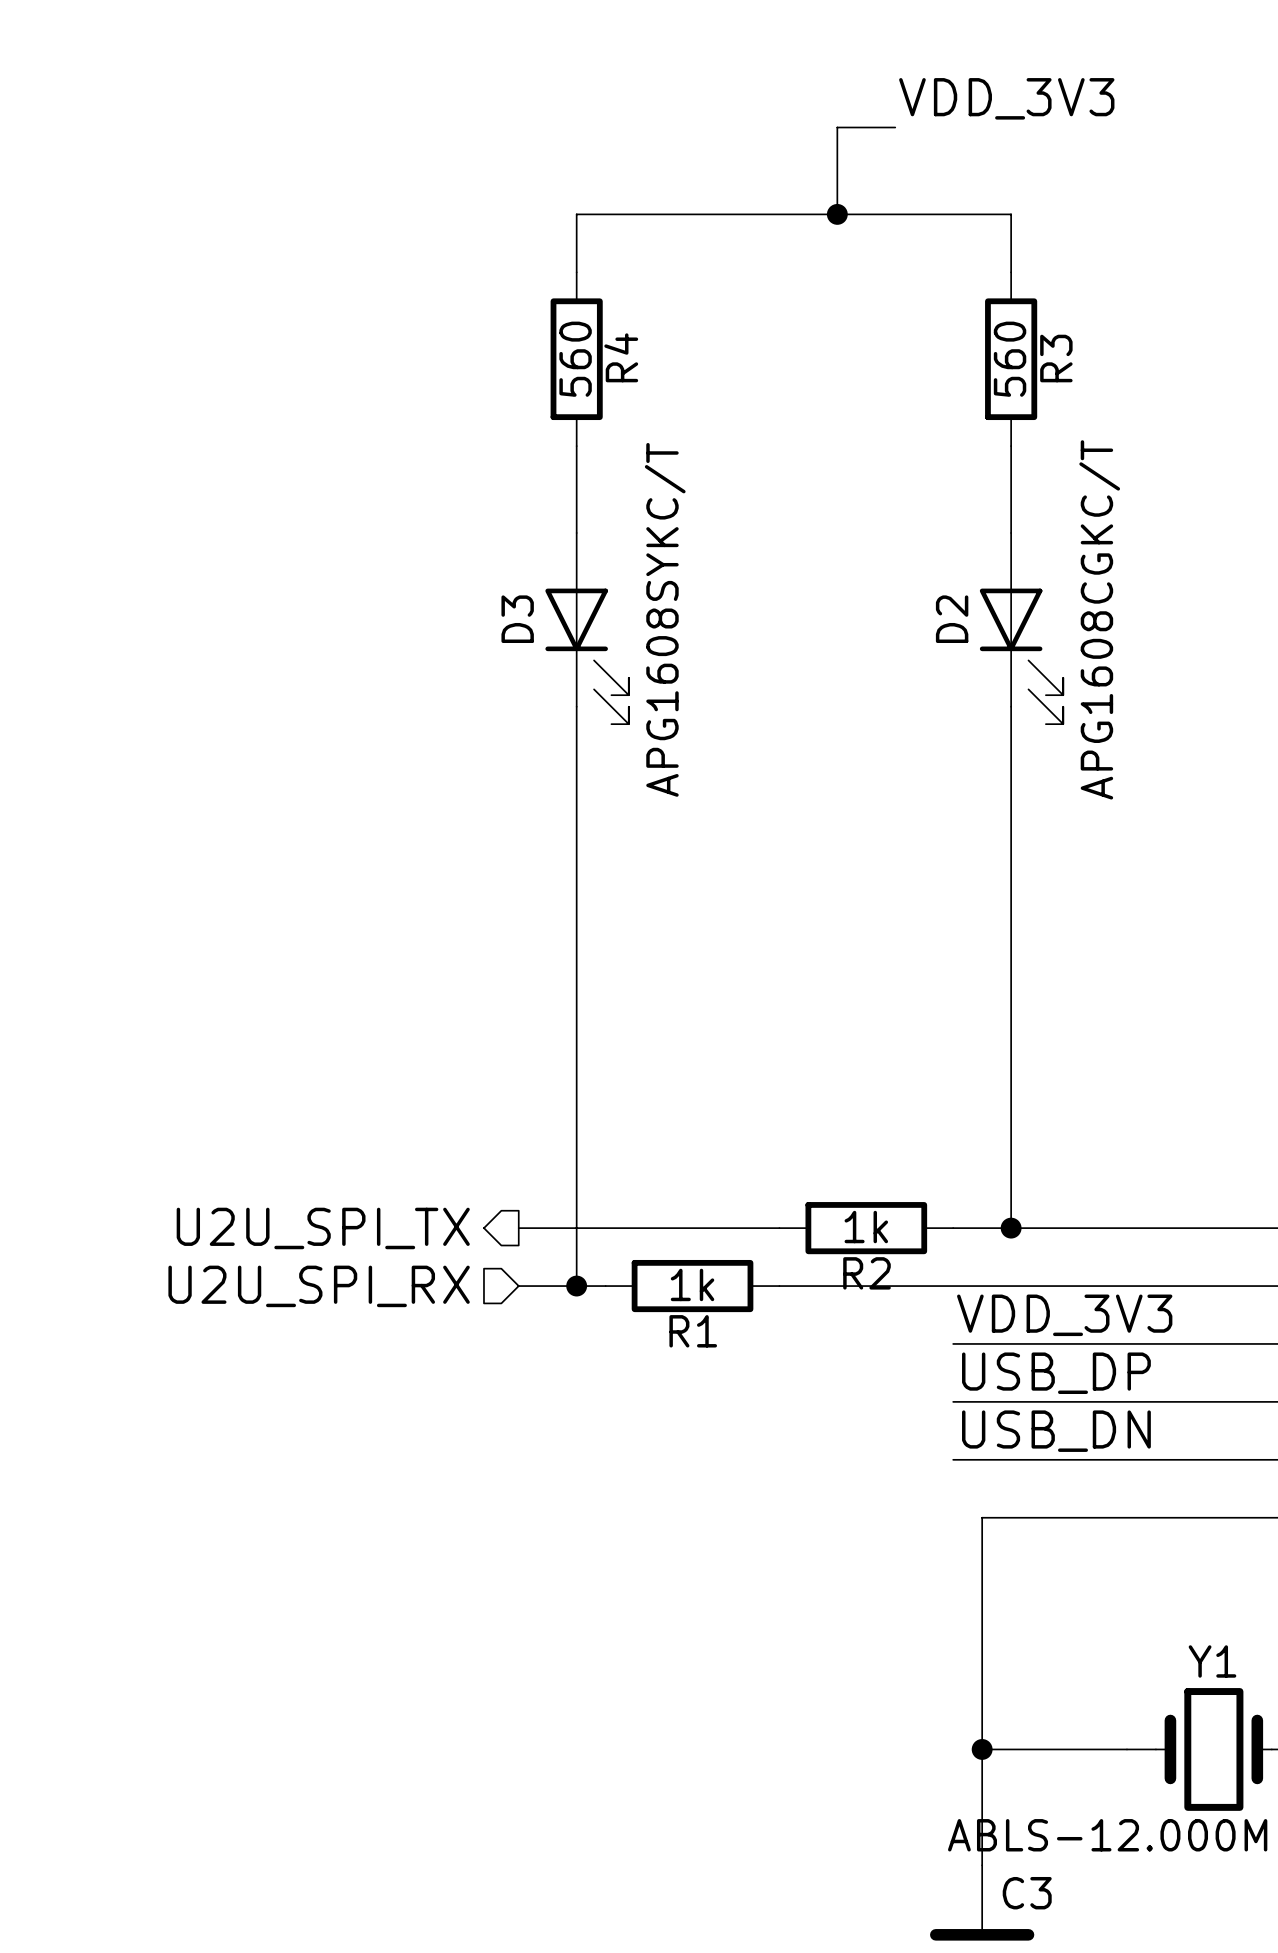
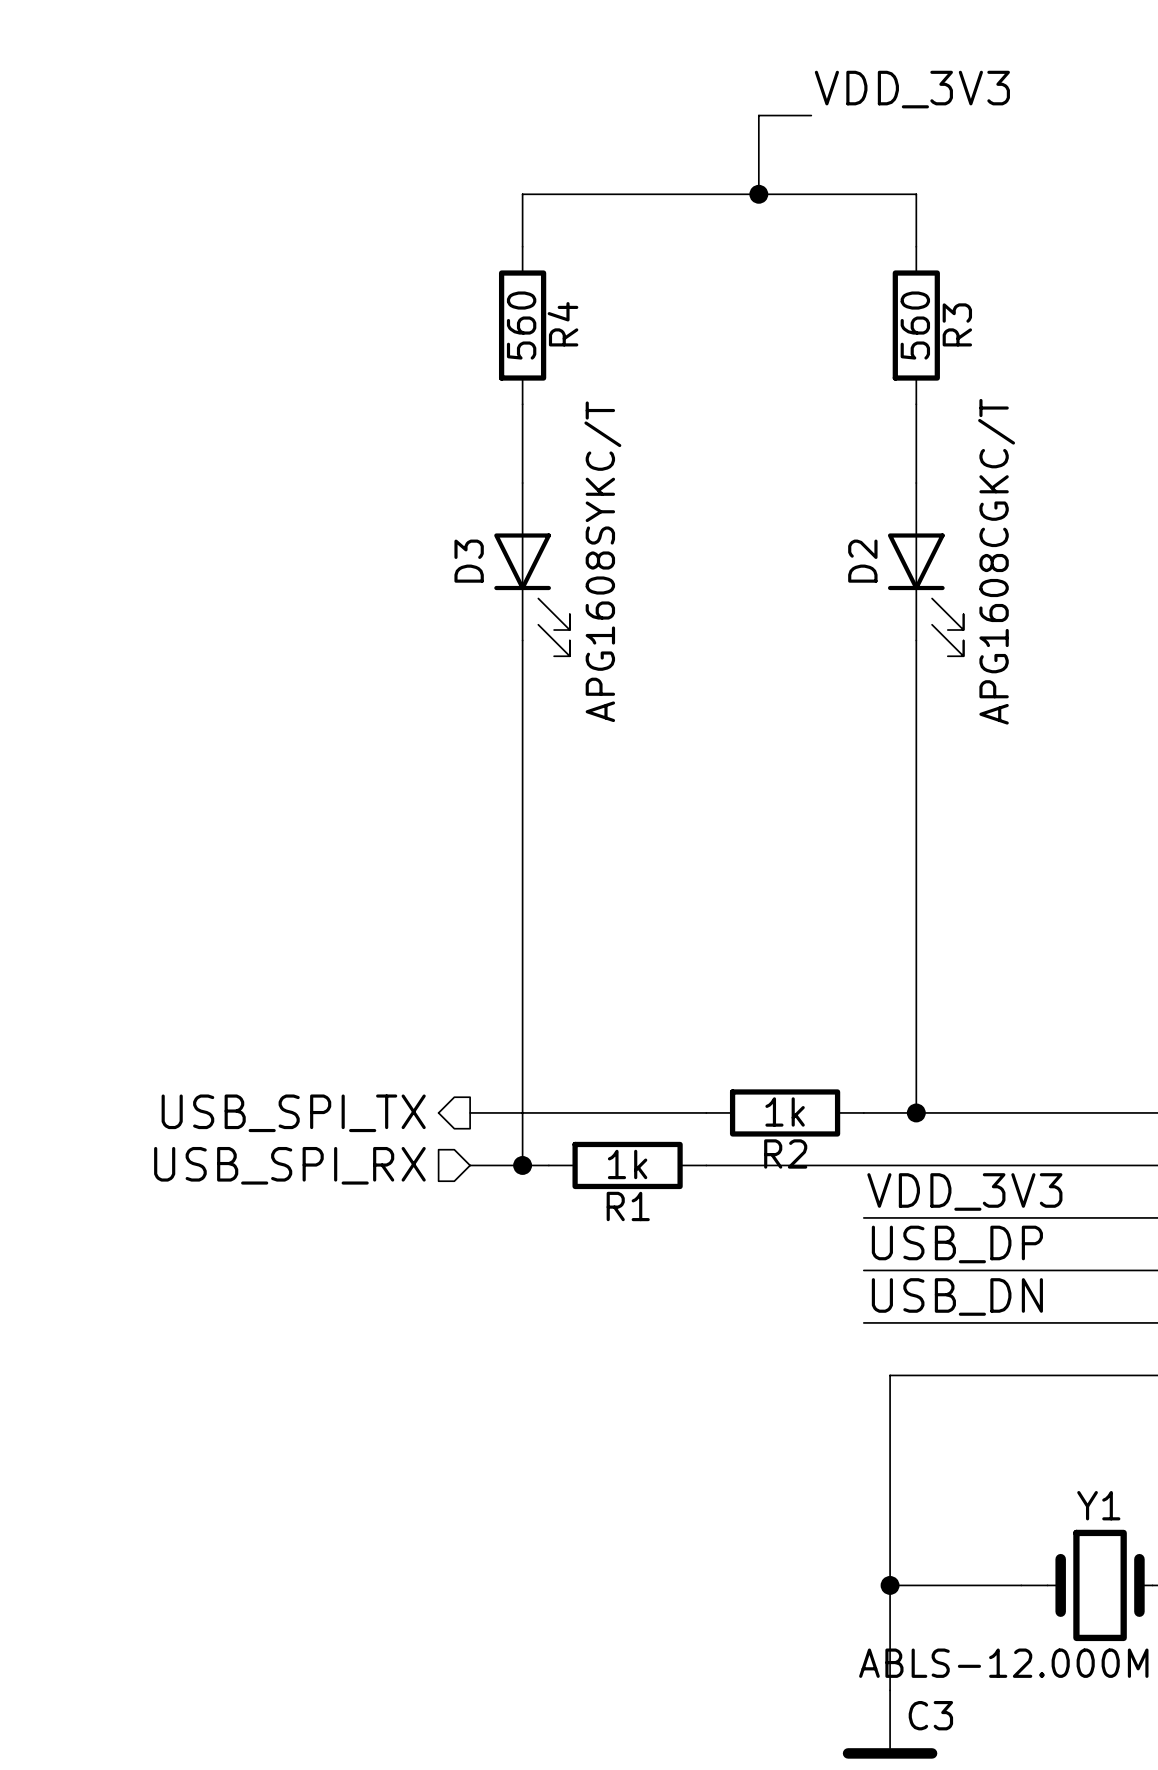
hierarchical label: U2U_SPI_TX (323, 1228) -> USB_SPI_TX (293, 1113)
hierarchical label: U2U_SPI_RX (319, 1286) -> USB_SPI_RX (289, 1165)

